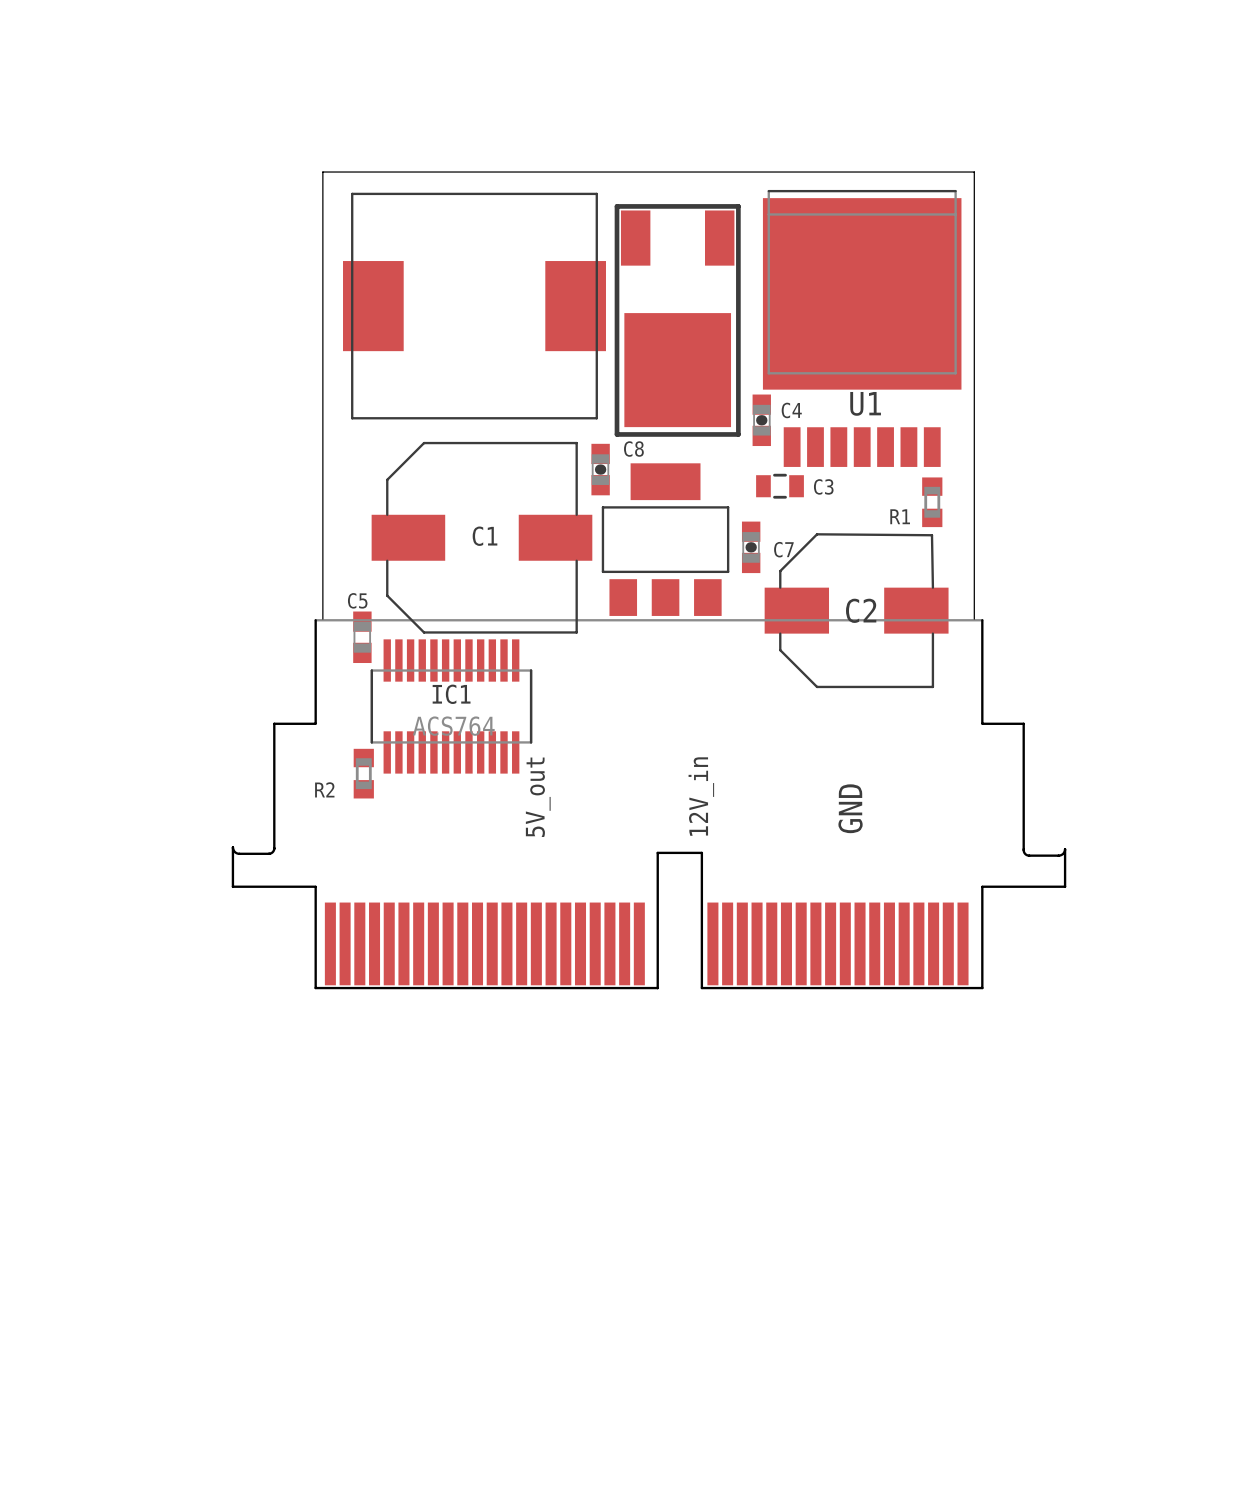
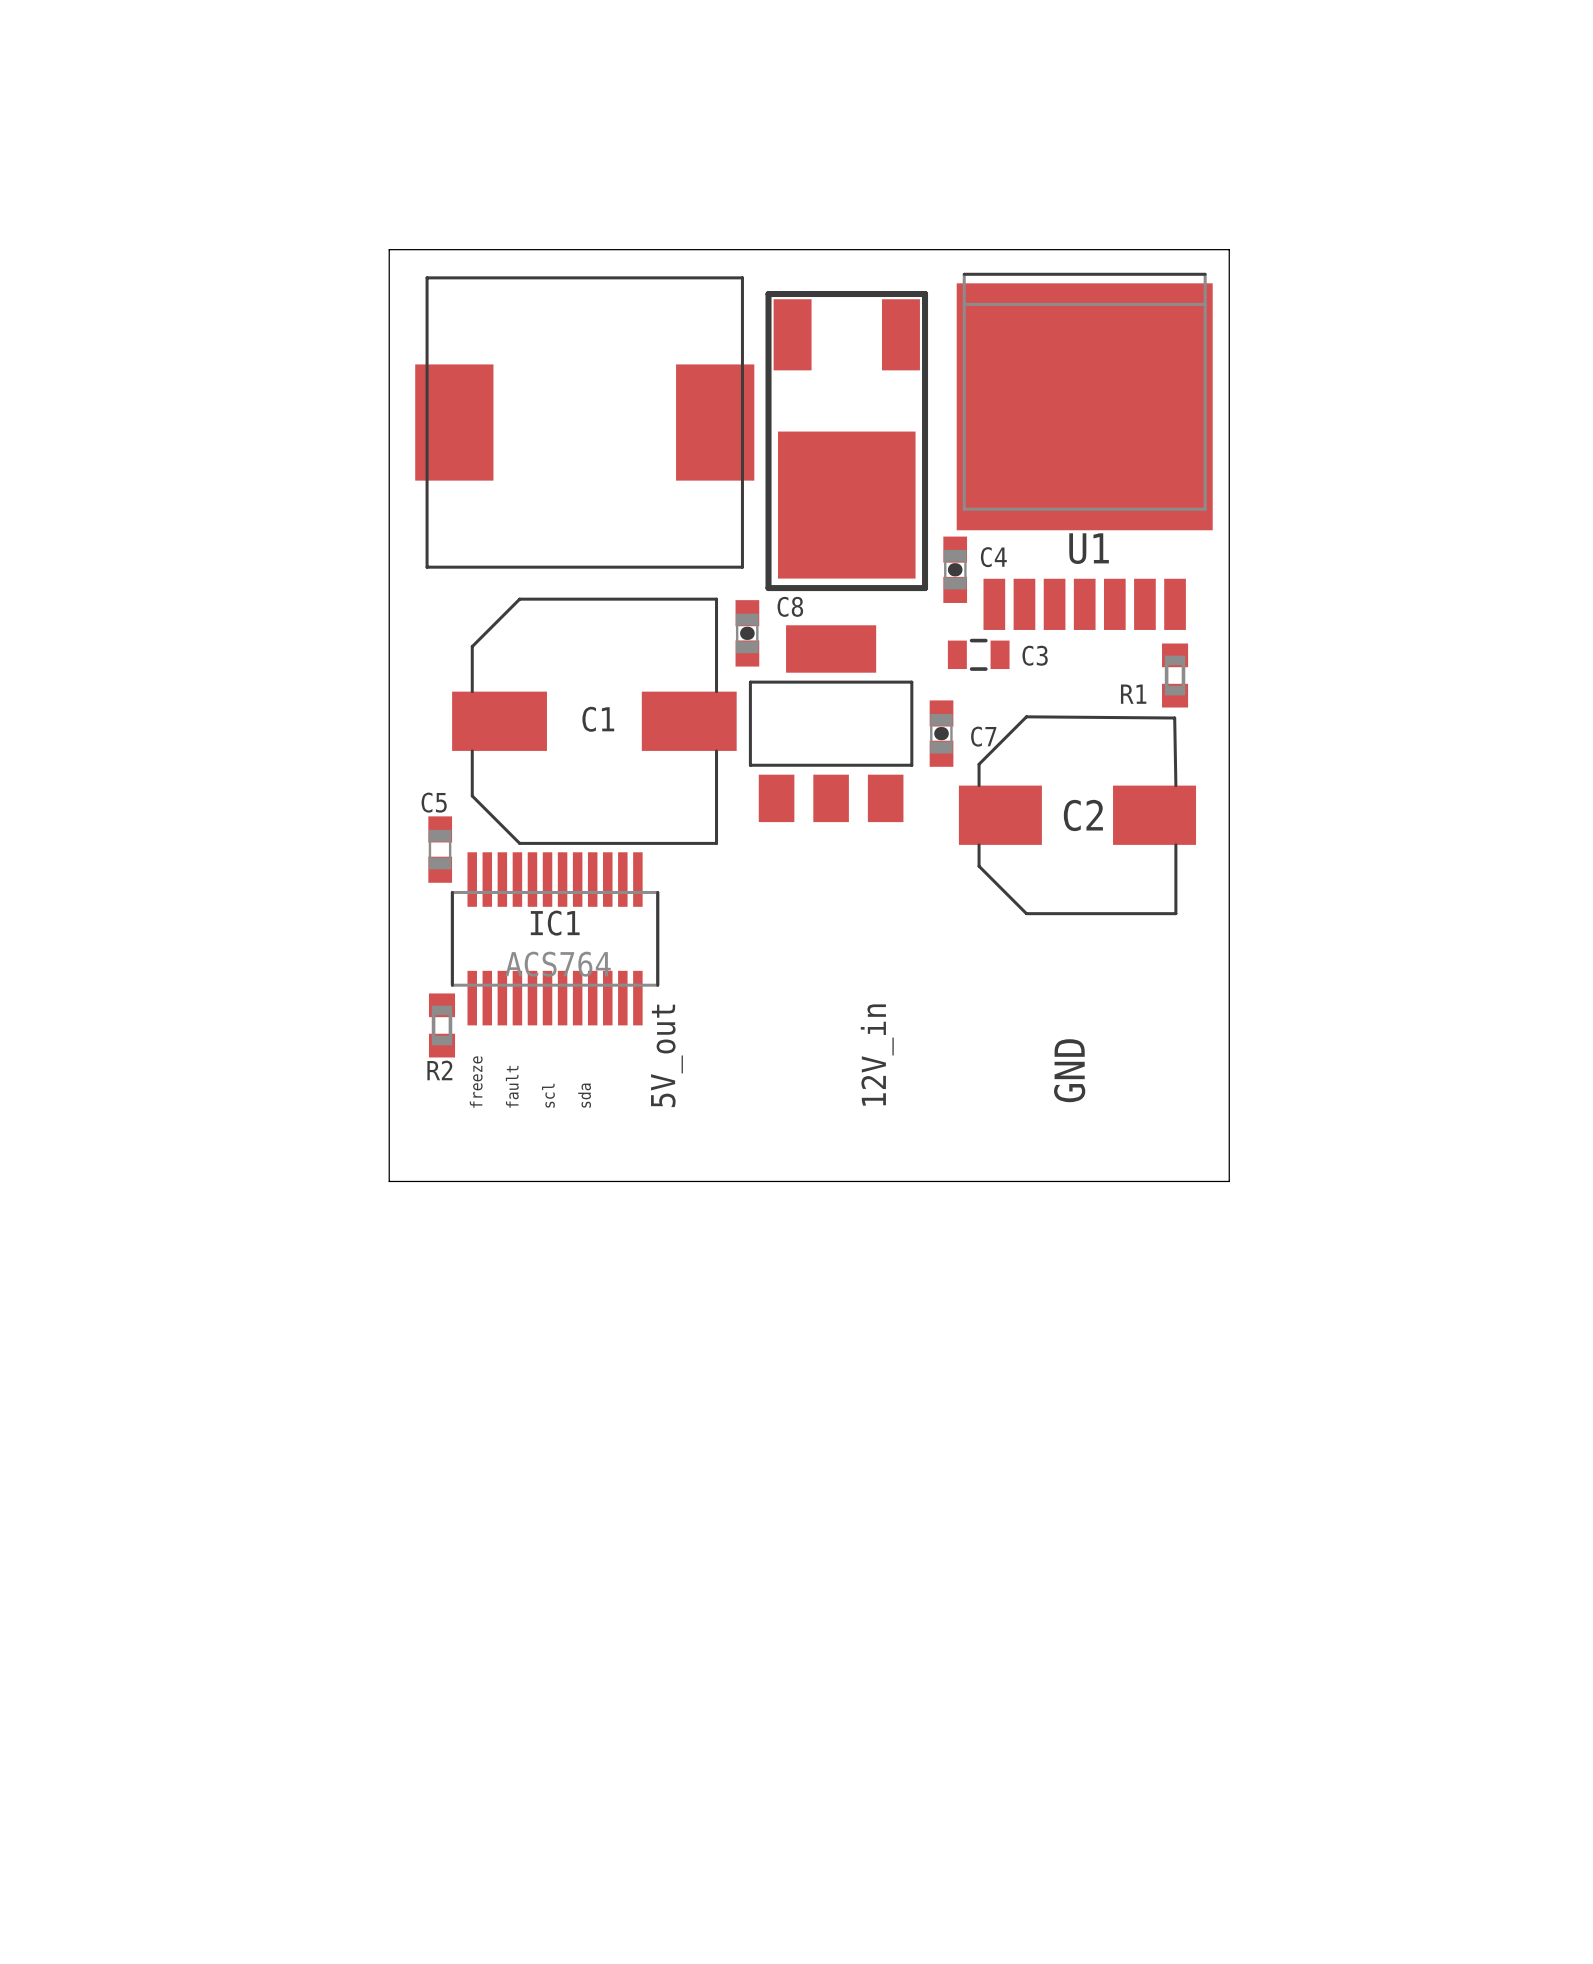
board edge: none -> (389, 826) (389, 1181) (1229, 1181) (1229, 826)
R2 name position: R2 (324, 789) -> R2 (439, 1070)
part: (649, 804) -> none
text: none -> freeze (476, 1082)
text: none -> fault (512, 1086)
text: none -> scl (548, 1095)
text: none -> sda (584, 1095)

